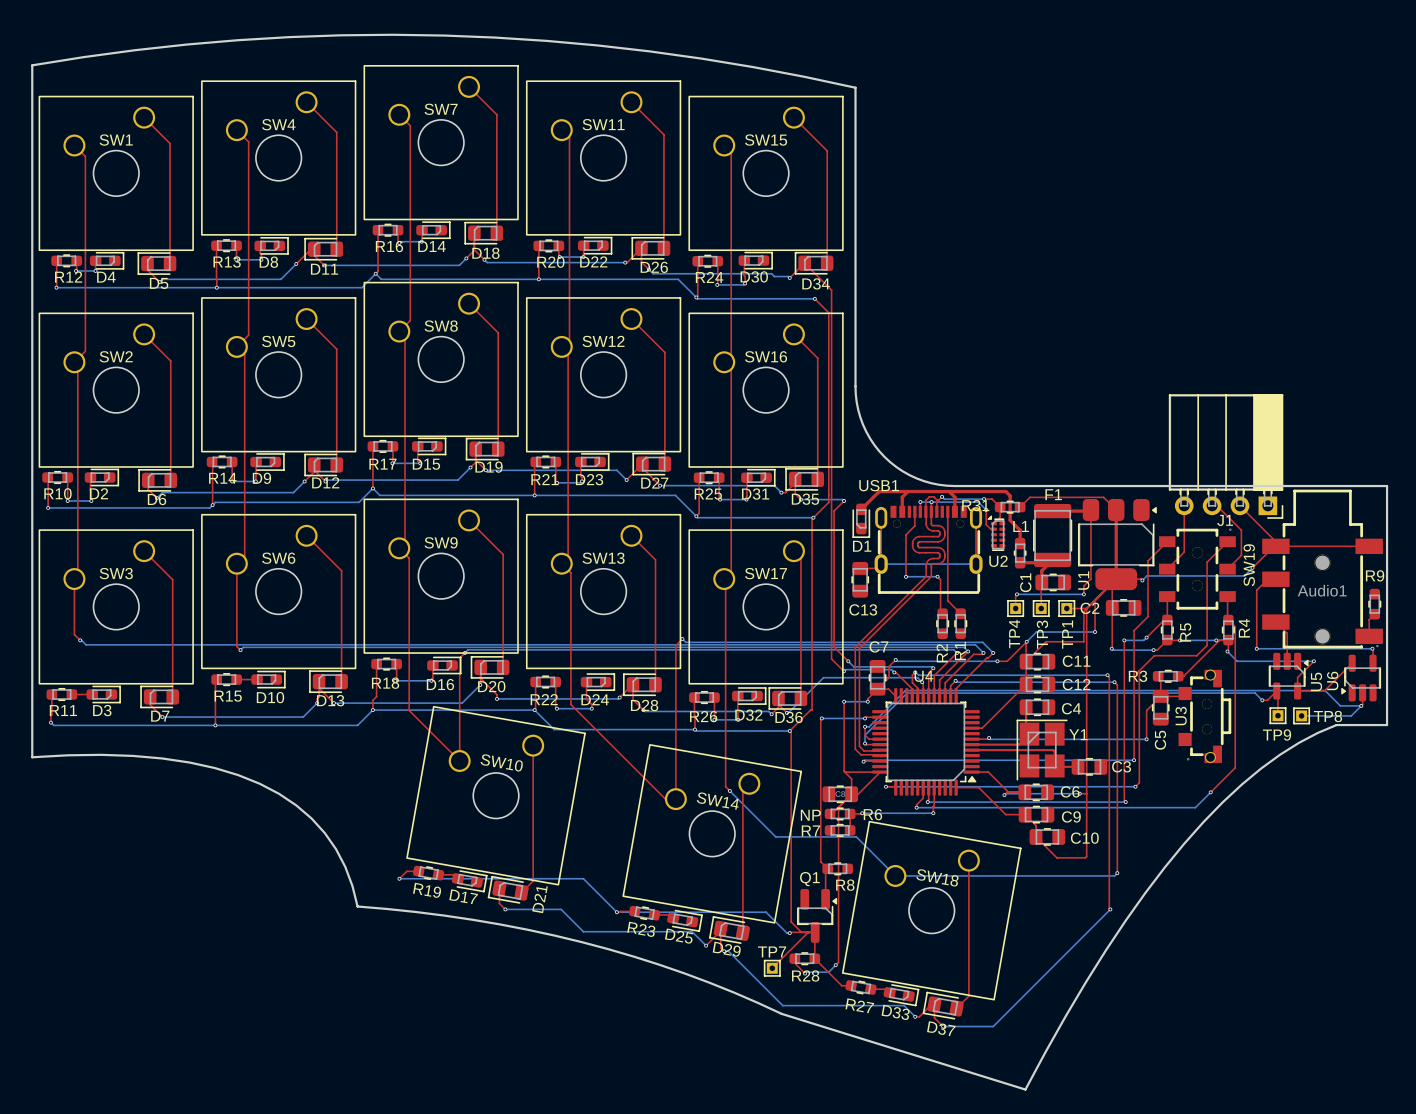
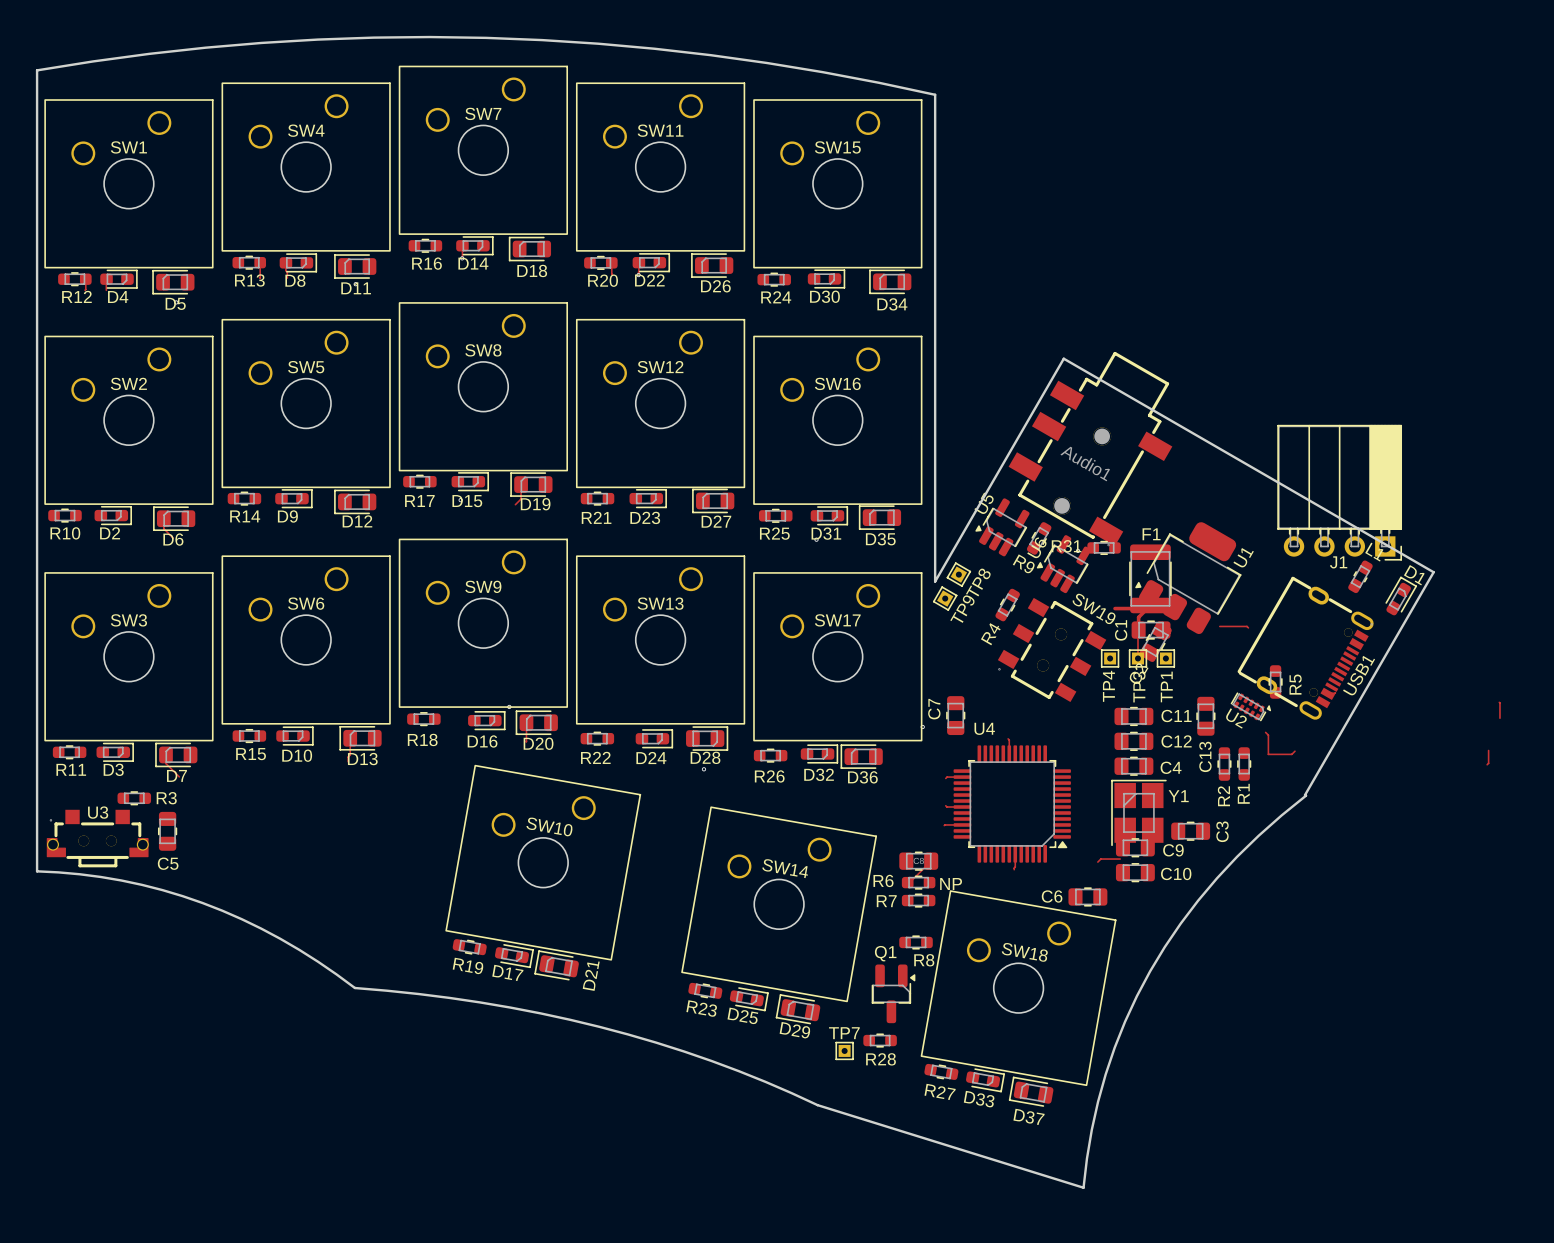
board edge: (32, 65) (32, 757) (132, 755) (189, 762) (238, 775) (279, 793) (311, 818) (336, 849) (345, 866) (357, 906) (472, 919) (527, 929) (607, 949) (684, 973) (781, 1013) (1025, 1089) (1085, 982) (1125, 921) (1164, 867) (1222, 802) (1261, 768) (1299, 742) (1317, 732) (1336, 725) (1387, 725) (1387, 486) (946, 485) (931, 483) (909, 475) (896, 466) (879, 451) (862, 424) (855, 394) (855, 87) (752, 66) (649, 51) (546, 40) (443, 35) (340, 35) (238, 40) (135, 50) (32, 65) -> (37, 70) (37, 871) (79, 874) (121, 880) (162, 890) (202, 903) (241, 919) (280, 938) (318, 961) (354, 988) (480, 1002) (540, 1013) (627, 1034) (711, 1061) (817, 1105) (1083, 1187) (1091, 1129) (1105, 1074) (1125, 1021) (1150, 971) (1180, 923) (1216, 878) (1258, 835) (1306, 795) (1433, 572) (1063, 358) (935, 581) (935, 94) (822, 72) (710, 55) (598, 43) (486, 37) (373, 37) (261, 42) (149, 53) (37, 70)
top track: (469, 86) (496, 114) (496, 233) -> none
top track: (306, 102) (336, 132) (336, 249) -> none
top track: (631, 102) (663, 134) (663, 248) -> none
top track: (399, 114) (410, 125) (410, 320) (399, 331) (405, 337) (405, 542) (399, 548) (409, 558) (409, 710) (459, 761) (459, 658) (464, 652) -> none
top track: (144, 117) (170, 143) (170, 263) -> none
top track: (793, 117) (827, 150) (827, 263) -> none
top track: (236, 130) (248, 141) (248, 335) (236, 346) (244, 354) (244, 555) (236, 563) (236, 646) (240, 650) -> none
top track: (561, 130) (569, 137) (569, 339) (561, 346) (568, 353) (568, 557) (561, 563) (570, 572) (570, 704) (665, 799) (675, 799) (675, 645) (682, 638) -> none
top track: (74, 145) (85, 156) (85, 351) (74, 362) (77, 365) (77, 575) (74, 579) (74, 634) (80, 640) -> none
top track: (724, 145) (731, 152) (731, 355) (724, 362) (731, 369) (731, 572) (724, 579) (725, 786) (729, 790) -> none
top track: (378, 230) (378, 271) (375, 273) -> none
top track: (398, 230) (399, 243) -> none
top track: (474, 233) (474, 250) (466, 258) -> none
bottom track: (421, 241) (399, 243) -> none
via: (399, 243) -> none
top track: (216, 245) (216, 287) -> none
top track: (538, 245) (538, 279) -> none
top track: (474, 249) (484, 259) -> none
bottom track: (559, 257) (583, 257) -> none
via: (559, 257) -> none
bottom track: (466, 258) (459, 265) (324, 265) -> none
via: (466, 258) -> none
bottom track: (236, 259) (261, 259) -> none
via: (236, 259) -> none
via: (261, 259) -> none
bottom track: (484, 259) (487, 262) (625, 262) -> none
via: (484, 259) -> none
top track: (56, 260) (56, 287) -> none
top track: (744, 260) (745, 283) -> none
top track: (697, 261) (696, 297) -> none
top track: (717, 261) (717, 284) -> none
top track: (625, 262) (641, 248) (641, 262) (648, 269) -> none
via: (625, 262) -> none
top track: (147, 263) (147, 269) (159, 282) -> none
top track: (296, 264) (311, 249) (314, 249) (314, 255) (324, 265) -> none
bottom track: (296, 264) (280, 279) (162, 279) (159, 282) -> none
via: (296, 264) -> none
bottom track: (648, 269) (653, 273) (771, 273) (774, 276) (789, 277) -> none
via: (648, 269) -> none
bottom track: (76, 270) (95, 270) -> none
via: (76, 270) -> none
via: (95, 270) -> none
via: (375, 273) -> none
top track: (789, 277) (804, 263) (831, 290) (831, 658) (843, 671) -> none
via: (789, 277) -> none
via: (538, 279) -> none
bottom track: (745, 283) (717, 284) -> none
via: (745, 283) -> none
via: (717, 284) -> none
bottom track: (56, 287) (361, 287) (375, 273) (381, 279) (678, 279) (697, 298) (814, 298) -> none
via: (56, 287) -> none
via: (216, 287) -> none
via: (696, 297) -> none
top track: (814, 298) (828, 312) (828, 502) (812, 519) (812, 710) (789, 730) (791, 921) (801, 932) -> none
via: (814, 298) -> none
top track: (469, 303) (498, 332) (498, 449) -> none
top track: (306, 319) (336, 349) (336, 464) -> none
top track: (631, 319) (664, 352) (664, 464) -> none
top track: (144, 334) (170, 361) (170, 480) -> none
top track: (793, 334) (817, 358) (817, 479) -> none
top track: (372, 446) (372, 488) -> none
top track: (392, 446) (392, 463) -> none
top track: (417, 446) (417, 460) (420, 463) -> none
top track: (475, 460) (485, 470) -> none
top track: (212, 461) (212, 505) -> none
top track: (232, 461) (232, 481) -> none
top track: (535, 461) (534, 495) -> none
top track: (555, 461) (556, 482) -> none
top track: (580, 461) (582, 481) -> none
top track: (256, 462) (255, 481) -> none
bottom track: (392, 463) (420, 463) -> none
via: (392, 463) -> none
top track: (314, 464) (314, 471) (304, 481) -> none
bottom track: (470, 467) (457, 480) (325, 481) -> none
via: (470, 467) -> none
top track: (314, 470) (325, 481) -> none
bottom track: (485, 470) (616, 470) (626, 480) -> none
via: (485, 470) -> none
top track: (47, 477) (48, 507) -> none
top track: (67, 477) (67, 500) -> none
top track: (90, 477) (91, 500) -> none
top track: (699, 477) (699, 513) (696, 516) -> none
top track: (719, 477) (720, 499) -> none
top track: (746, 477) (746, 499) -> none
top track: (795, 479) (795, 493) (800, 499) -> none
top track: (626, 480) (642, 464) (642, 467) (660, 485) -> none
via: (626, 480) -> none
bottom track: (232, 481) (255, 481) -> none
via: (232, 481) -> none
via: (255, 481) -> none
bottom track: (304, 481) (293, 492) (162, 492) (156, 498) -> none
via: (304, 481) -> none
via: (325, 481) -> none
bottom track: (582, 481) (556, 482) -> none
via: (582, 481) -> none
via: (556, 482) -> none
top track: (795, 482) (785, 492) (781, 492) -> none
bottom track: (660, 485) (774, 485) (781, 492) -> none
via: (660, 485) -> none
USB1 name position: USB1 (879, 485) -> USB1 (1359, 675)
via: (372, 488) -> none
top track: (907, 491) (902, 497) (902, 511) -> none
top track: (949, 491) (954, 497) (954, 511) -> none
via: (781, 492) -> none
via: (534, 495) -> none
top track: (942, 496) (936, 499) -> none
bottom track: (942, 496) (944, 499) (984, 499) -> none
via: (942, 496) -> none
via: (156, 498) -> none
bottom track: (720, 499) (746, 499) -> none
via: (720, 499) -> none
bottom track: (800, 499) (844, 500) -> none
via: (800, 499) -> none
top track: (936, 499) (936, 511) -> none
top track: (936, 499) (933, 496) (929, 496) (925, 500) (926, 524) (930, 530) (939, 531) (939, 535) (917, 536) (913, 540) (912, 545) (916, 552) (938, 552) (939, 557) (928, 560) (926, 576) (855, 647) (855, 749) (860, 754) (880, 755) -> none
top track: (984, 499) (992, 499) (1000, 507) (1000, 517) (993, 523) -> none
via: (984, 499) -> none
bottom track: (67, 500) (91, 500) -> none
via: (67, 500) -> none
via: (91, 500) -> none
top track: (844, 500) (834, 511) (834, 647) (848, 661) -> none
via: (844, 500) -> none
via: (920, 501) -> none
bottom track: (920, 502) (978, 502) (986, 509) -> none
top track: (931, 502) (931, 524) (942, 527) (944, 537) (939, 541) (919, 541) (917, 546) (940, 548) (944, 553) (944, 559) (940, 563) (931, 564) (931, 576) (859, 648) (859, 746) (864, 750) (880, 750) -> none
via: (931, 502) -> none
via: (212, 505) -> none
top track: (1184, 505) (1184, 552) (1167, 569) -> none
top track: (1212, 505) (1216, 505) (1241, 530) (1241, 555) (1227, 569) -> none
top track: (1240, 505) (1275, 541) (1275, 546) -> none
bottom track: (48, 507) (209, 507) (215, 502) (359, 502) (372, 488) (379, 495) (675, 495) (697, 517) (813, 517) -> none
via: (48, 507) -> none
top track: (1020, 507) (1029, 497) (1103, 497) (1116, 509) (1116, 579) (1083, 611) (1083, 641) (1045, 641) (1026, 661) -> none
top track: (861, 509) (879, 491) (1005, 491) (1010, 495) (1010, 520) (1020, 530) (1020, 543) -> none
top track: (986, 509) (986, 524) (990, 529) (993, 529) -> none
top track: (914, 511) (914, 525) (905, 534) (905, 576) -> none
top track: (947, 511) (947, 600) (960, 613) -> none
top track: (1052, 511) (1090, 509) (1090, 578) (1083, 586) (1083, 594) -> none
via: (696, 516) -> none
via: (813, 517) -> none
top track: (881, 517) (881, 564) (876, 568) (860, 568) -> none
top track: (976, 517) (976, 564) -> none
top track: (469, 520) (503, 554) (503, 667) -> none
D1 rotation: 0° (861, 520) -> 150° counterclockwise (1401, 596)
D1 position: (861, 520) -> (1401, 596)
U2 rotation: 0° (996, 533) -> 120° clockwise (1250, 706)
U2 position: (996, 533) -> (1250, 706)
top track: (306, 535) (341, 570) (341, 681) -> none
top track: (631, 535) (655, 559) (655, 684) -> none
top track: (1167, 541) (1148, 560) (1148, 616) (1134, 630) (1134, 760) -> none
top track: (1227, 541) (1207, 562) (1207, 645) (1196, 655) (1154, 655) (1136, 673) -> none
U1 rotation: 0° (1117, 544) -> 150° counterclockwise (1188, 578)
top track: (1369, 546) (1274, 546) (1252, 567) -> none
USB1 rotation: 0° (928, 549) -> 120° clockwise (1305, 648)
USB1 position: (928, 549) -> (1305, 648)
top track: (144, 551) (172, 579) (172, 696) -> none
top track: (793, 551) (800, 558) (800, 698) -> none
L1 rotation: 0° (1020, 553) -> 30° clockwise (1360, 576)
L1 position: (1020, 553) -> (1360, 576)
U2 name position: U2 (998, 561) -> U2 (1236, 718)
bottom track: (881, 564) (976, 564) -> none
SW19 name position: SW19 (1249, 565) -> SW19 (1093, 609)
bottom track: (1252, 567) (1244, 575) (1146, 575) (1142, 580) -> none
via: (1252, 567) -> none
SW19 rotation: 0° (1197, 569) -> 150° counterclockwise (1052, 649)
SW19 position: (1197, 569) -> (1052, 649)
Audio1 rotation: 0° (1322, 569) -> 30° clockwise (1090, 448)
Audio1 position: (1322, 569) -> (1090, 448)
R9 name position: R9 (1375, 575) -> R9 (1023, 564)
via: (905, 576) -> none
bottom track: (906, 576) (937, 576) -> none
top track: (937, 576) (940, 579) (940, 611) (942, 613) -> none
via: (937, 576) -> none
C13 position: (860, 579) -> (1205, 716)
top track: (1275, 579) (1267, 579) (1256, 590) (1256, 648) -> none
via: (1142, 580) -> none
top track: (1112, 583) (1111, 648) -> none
top track: (1016, 594) (1015, 608) -> none
bottom track: (1016, 594) (1083, 594) -> none
via: (1016, 594) -> none
via: (1083, 594) -> none
top track: (1167, 596) (1167, 620) (1164, 620) (1146, 637) -> none
top track: (1227, 596) (1228, 620) (1235, 626) (1235, 767) (1210, 792) -> none
top track: (1095, 600) (1095, 632) -> none
R9 rotation: 0° (1374, 604) -> 30° clockwise (1039, 538)
R9 position: (1374, 604) -> (1039, 538)
C2 rotation: 0° (1123, 607) -> 60° counterclockwise (1155, 641)
C2 position: (1123, 607) -> (1155, 641)
top track: (1066, 608) (1086, 608) -> none
top track: (1086, 608) (1086, 856) (1056, 857) (1036, 836) (1036, 825) (1025, 814) (1005, 814) (978, 787) (956, 787) -> none
C13 name rotation: 0° (863, 609) -> 90° counterclockwise (1205, 756)
top track: (1374, 614) (1369, 619) (1369, 636) -> none
top track: (1275, 622) (1287, 633) (1287, 661) -> none
R2 position: (942, 623) -> (1224, 764)
R1 position: (960, 623) -> (1244, 764)
R4 name position: R4 (1244, 628) -> R4 (990, 634)
R4 rotation: 0° (1228, 630) -> 30° clockwise (1007, 605)
R4 position: (1228, 630) -> (1007, 605)
bottom track: (1095, 632) (1036, 632) (1026, 641) -> none
via: (1095, 632) -> none
bottom track: (1146, 637) (1143, 640) (1124, 640) -> none
via: (1146, 637) -> none
bottom track: (682, 638) (685, 642) (982, 642) (993, 652) -> none
via: (682, 638) -> none
bottom track: (80, 640) (86, 644) (975, 644) (983, 652) -> none
via: (80, 640) -> none
top track: (1124, 640) (1125, 802) -> none
via: (1124, 640) -> none
top track: (1180, 640) (1167, 640) (1157, 650) (1153, 650) -> none
bottom track: (1180, 640) (1216, 640) -> none
via: (1180, 640) -> none
via: (1216, 640) -> none
top track: (1026, 641) (1007, 661) (997, 661) -> none
via: (1026, 641) -> none
top track: (1026, 642) (1026, 684) -> none
C7 name rotation: 0° (878, 646) -> 90° counterclockwise (934, 709)
bottom track: (1111, 648) (1153, 650) -> none
via: (1111, 648) -> none
bottom track: (1256, 648) (1372, 648) -> none
via: (1256, 648) -> none
via: (1372, 648) -> none
bottom track: (240, 650) (243, 647) (964, 647) (968, 651) -> none
via: (240, 650) -> none
via: (1153, 650) -> none
top track: (968, 651) (939, 680) (939, 696) -> none
via: (968, 651) -> none
top track: (1227, 651) (1228, 640) (1219, 640) (1183, 676) (1178, 676) -> none
bottom track: (1227, 651) (1237, 661) (1313, 661) -> none
via: (1227, 651) -> none
bottom track: (464, 652) (468, 649) (953, 649) (957, 652) -> none
top track: (957, 652) (934, 675) (934, 696) -> none
via: (957, 652) -> none
top track: (983, 652) (973, 654) (945, 682) (945, 696) -> none
via: (983, 652) -> none
top track: (993, 652) (956, 688) (956, 696) -> none
via: (993, 652) -> none
top track: (895, 659) (889, 666) (889, 677) (867, 698) (867, 701) -> none
bottom track: (895, 659) (997, 661) -> none
via: (895, 659) -> none
bottom track: (848, 661) (853, 666) (933, 668) -> none
via: (848, 661) -> none
via: (997, 661) -> none
top track: (1313, 661) (1297, 677) (1297, 690) (1324, 690) (1352, 663) -> none
via: (1313, 661) -> none
top track: (376, 664) (376, 696) (372, 700) (372, 710) -> none
top track: (396, 664) (395, 680) -> none
top track: (432, 665) (431, 680) -> none
top track: (933, 668) (928, 672) (928, 696) -> none
via: (933, 668) -> none
bottom track: (843, 671) (845, 669) (891, 669) (894, 672) -> none
top track: (1138, 671) (1139, 782) (1135, 786) -> none
top track: (894, 672) (912, 688) (912, 696) -> none
via: (894, 672) -> none
top track: (915, 672) (912, 675) (912, 682) (917, 688) (917, 696) -> none
bottom track: (915, 672) (918, 675) (1107, 675) -> none
via: (915, 672) -> none
top track: (1107, 675) (1109, 676) (1110, 909) -> none
via: (1107, 675) -> none
U4 name position: U4 (923, 676) -> U4 (984, 728)
R3 name position: R3 (1138, 676) -> R3 (166, 798)
R3 position: (1168, 676) -> (134, 798)
U5 rotation: 0° (1288, 676) -> 150° counterclockwise (1002, 527)
U5 position: (1288, 676) -> (1002, 527)
C7 position: (877, 677) -> (955, 715)
top track: (480, 678) (497, 694) (497, 698) -> none
U6 rotation: 0° (1361, 678) -> 30° clockwise (1063, 564)
U6 position: (1361, 678) -> (1063, 564)
top track: (216, 679) (215, 725) -> none
top track: (236, 679) (257, 679) -> none
bottom track: (395, 680) (431, 680) -> none
via: (395, 680) -> none
via: (431, 680) -> none
top track: (955, 680) (950, 685) (950, 696) -> none
bottom track: (955, 680) (1114, 682) -> none
via: (955, 680) -> none
top track: (535, 681) (534, 710) -> none
top track: (555, 681) (556, 708) -> none
top track: (586, 682) (586, 699) (591, 704) (591, 708) -> none
bottom track: (922, 682) (917, 677) (823, 677) (786, 712) -> none
via: (922, 682) -> none
top track: (1114, 682) (1117, 684) (1117, 873) -> none
via: (1114, 682) -> none
bottom track: (480, 684) (462, 703) (333, 703) -> none
via: (480, 684) -> none
D28 rotation: 0° (642, 684) -> 180° (707, 738)
top track: (1025, 684) (982, 728) (971, 728) -> none
top track: (319, 688) (333, 703) -> none
top track: (877, 689) (888, 689) (895, 696) -> none
top track: (51, 694) (50, 722) -> none
top track: (71, 694) (92, 694) -> none
top track: (737, 696) (738, 719) -> none
top track: (1160, 696) (1146, 710) (1146, 739) -> none
top track: (619, 697) (633, 684) (633, 699) (643, 710) -> none
bottom track: (619, 697) (497, 698) -> none
via: (619, 697) -> none
top track: (694, 697) (694, 729) -> none
top track: (714, 697) (714, 719) -> none
via: (497, 698) -> none
top track: (778, 698) (778, 707) (771, 714) -> none
top track: (1262, 700) (1267, 700) (1276, 690) (1277, 715) -> none
bottom track: (1262, 700) (1255, 693) (907, 693) (865, 735) (865, 743) -> none
via: (1262, 700) -> none
top track: (844, 701) (844, 771) (851, 778) (851, 794) (858, 794) (880, 772) (845, 772) -> none
bottom track: (844, 701) (867, 701) -> none
via: (844, 701) -> none
via: (867, 701) -> none
bottom track: (317, 703) (303, 717) (162, 717) -> none
via: (317, 703) -> none
via: (333, 703) -> none
top track: (778, 704) (786, 712) -> none
via: (1361, 705) -> none
top track: (1026, 707) (1026, 730) (1029, 734) (1018, 744) (971, 744) -> none
C5 position: (1160, 707) -> (167, 831)
bottom track: (556, 708) (591, 708) -> none
via: (556, 708) -> none
via: (591, 708) -> none
via: (372, 710) -> none
via: (534, 710) -> none
bottom track: (643, 710) (768, 711) (771, 714) -> none
via: (786, 712) -> none
via: (771, 714) -> none
TP9 rotation: 0° (1277, 715) -> 30° clockwise (945, 598)
TP9 position: (1277, 715) -> (945, 598)
bottom track: (1301, 715) (1351, 715) (1361, 705) (1340, 705) (1325, 690) (905, 690) (869, 726) (865, 726) -> none
TP8 rotation: 0° (1301, 715) -> 30° clockwise (958, 574)
TP8 position: (1301, 715) -> (958, 574)
U3 rotation: 0° (1204, 716) -> 90° clockwise (97, 838)
U3 position: (1204, 716) -> (97, 838)
via: (162, 717) -> none
top track: (821, 718) (820, 861) (827, 868) (825, 870) (825, 899) -> none
bottom track: (821, 718) (865, 718) -> none
via: (821, 718) -> none
via: (865, 718) -> none
bottom track: (714, 719) (738, 719) -> none
via: (714, 719) -> none
via: (738, 719) -> none
bottom track: (50, 722) (53, 725) (357, 725) (372, 710) (534, 710) (554, 729) (789, 730) -> none
via: (50, 722) -> none
via: (215, 725) -> none
top track: (865, 726) (865, 735) (869, 739) (880, 739) -> none
via: (865, 726) -> none
via: (694, 729) -> none
via: (789, 730) -> none
top track: (989, 737) (971, 739) -> none
bottom track: (989, 737) (1146, 739) -> none
via: (989, 737) -> none
via: (1146, 739) -> none
C5 name rotation: 0° (1160, 740) -> 90° clockwise (168, 863)
via: (865, 743) -> none
top track: (533, 745) (533, 881) (521, 892) -> none
top track: (971, 750) (1053, 750) (1055, 766) (1078, 766) -> none
bottom track: (1134, 760) (863, 761) -> none
via: (1134, 760) -> none
via: (863, 761) -> none
C3 name rotation: 0° (1121, 766) -> 90° counterclockwise (1222, 831)
top track: (971, 772) (988, 772) (1008, 792) -> none
top track: (749, 783) (742, 790) (742, 932) -> none
top track: (885, 786) (895, 787) -> none
bottom track: (885, 786) (1135, 786) -> none
via: (885, 786) -> none
via: (1135, 786) -> none
top track: (923, 787) (923, 798) (916, 804) (916, 807) -> none
top track: (934, 787) (933, 813) -> none
bottom track: (729, 790) (775, 836) (856, 836) (895, 875) (1114, 875) (1117, 873) -> none
via: (729, 790) -> none
C6 name position: C6 (1070, 791) -> C6 (1052, 896)
C6 position: (1036, 792) -> (1087, 896)
bottom track: (1210, 792) (1195, 807) (916, 807) -> none
via: (1210, 792) -> none
top track: (1079, 793) (1086, 793) -> none
bottom track: (1079, 793) (1004, 795) -> none
via: (1079, 793) -> none
via: (1004, 795) -> none
bottom track: (927, 802) (1125, 802) -> none
via: (927, 802) -> none
via: (1125, 802) -> none
top track: (838, 807) (838, 962) (835, 965) -> none
via: (916, 807) -> none
top track: (862, 813) (850, 813) (850, 830) -> none
bottom track: (862, 813) (933, 813) -> none
via: (862, 813) -> none
via: (933, 813) -> none
R6 name position: R6 (872, 814) -> R6 (883, 880)
C9 position: (1036, 814) -> (1135, 847)
text position: NP (810, 815) -> NP (951, 884)
C10 position: (1047, 836) -> (1135, 872)
top track: (968, 860) (968, 996) (956, 1008) -> none
top track: (418, 871) (406, 871) (399, 878) -> none
via: (1117, 873) -> none
top track: (438, 874) (453, 874) (457, 878) -> none
bottom track: (399, 878) (583, 878) (616, 912) (766, 912) (786, 933) (789, 933) -> none
via: (399, 878) -> none
top track: (499, 888) (499, 903) (505, 909) -> none
bottom track: (505, 909) (561, 909) (583, 931) (692, 931) (706, 945) -> none
via: (505, 909) -> none
bottom track: (1110, 909) (993, 1026) (943, 1026) -> none
via: (1110, 909) -> none
top track: (634, 911) (616, 912) -> none
via: (616, 912) -> none
top track: (654, 914) (669, 914) (673, 918) -> none
top track: (720, 928) (720, 947) (724, 951) -> none
top track: (720, 931) (706, 945) -> none
top track: (808, 932) (772, 968) -> none
top track: (789, 933) (815, 932) (814, 958) (841, 985) (851, 985) -> none
via: (789, 933) -> none
via: (706, 945) -> none
bottom track: (724, 951) (728, 951) (782, 1005) (904, 1005) (915, 1016) -> none
via: (724, 951) -> none
top track: (794, 958) (794, 963) (805, 973) -> none
bottom track: (835, 965) (828, 972) (805, 973) -> none
via: (835, 965) -> none
via: (805, 973) -> none
top track: (870, 989) (886, 989) (889, 992) -> none
top track: (915, 1016) (919, 1016) (931, 1004) (934, 1004) (934, 1017) (943, 1026) -> none
via: (915, 1016) -> none
via: (943, 1026) -> none

